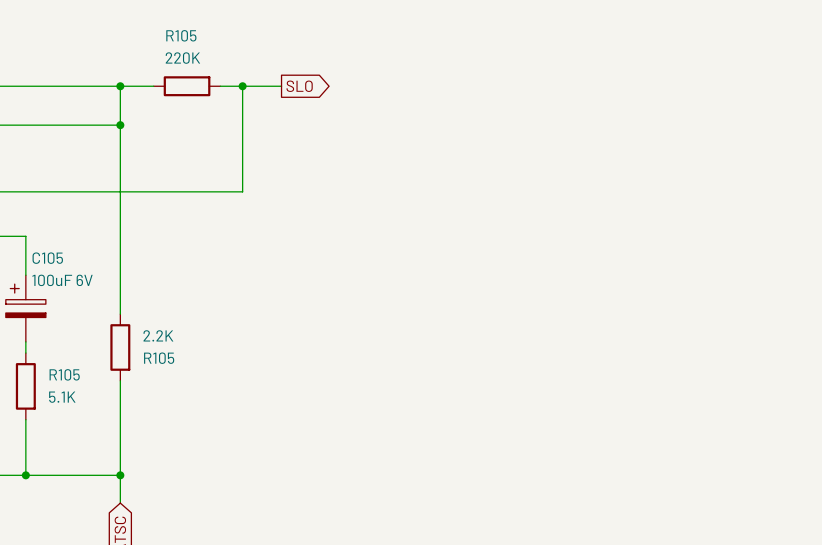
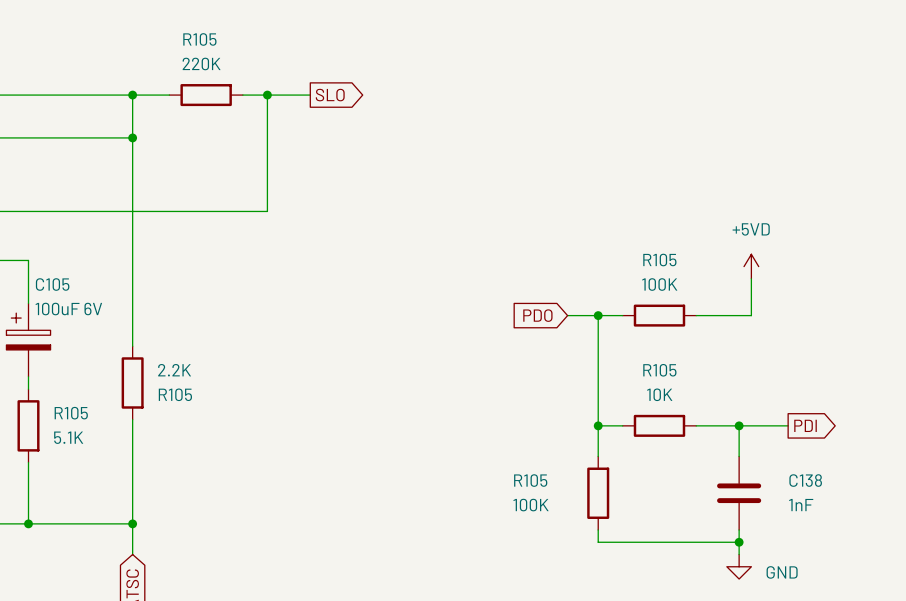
power symbol: none -> +5VD (751, 266)
wire: none -> (751, 278) (751, 315) (696, 315)
global label: none -> PDO (537, 315)
wire: none -> (567, 315) (622, 315)
wire: none -> (598, 315) (598, 456)
junction: none -> (598, 315)
R105: none -> 100K (659, 315)
wire: none -> (598, 425) (622, 425)
junction: none -> (598, 425)
R105: none -> 10K (659, 425)
wire: none -> (696, 425) (788, 425)
wire: none -> (739, 425) (739, 456)
junction: none -> (739, 425)
global label: none -> PDI (805, 425)
R105: none -> 100K (598, 493)
C138: none -> 1nF (739, 493)
wire: none -> (598, 530) (598, 542) (739, 542)
wire: none -> (739, 530) (739, 554)
junction: none -> (739, 542)
power symbol: none -> GND (739, 566)

